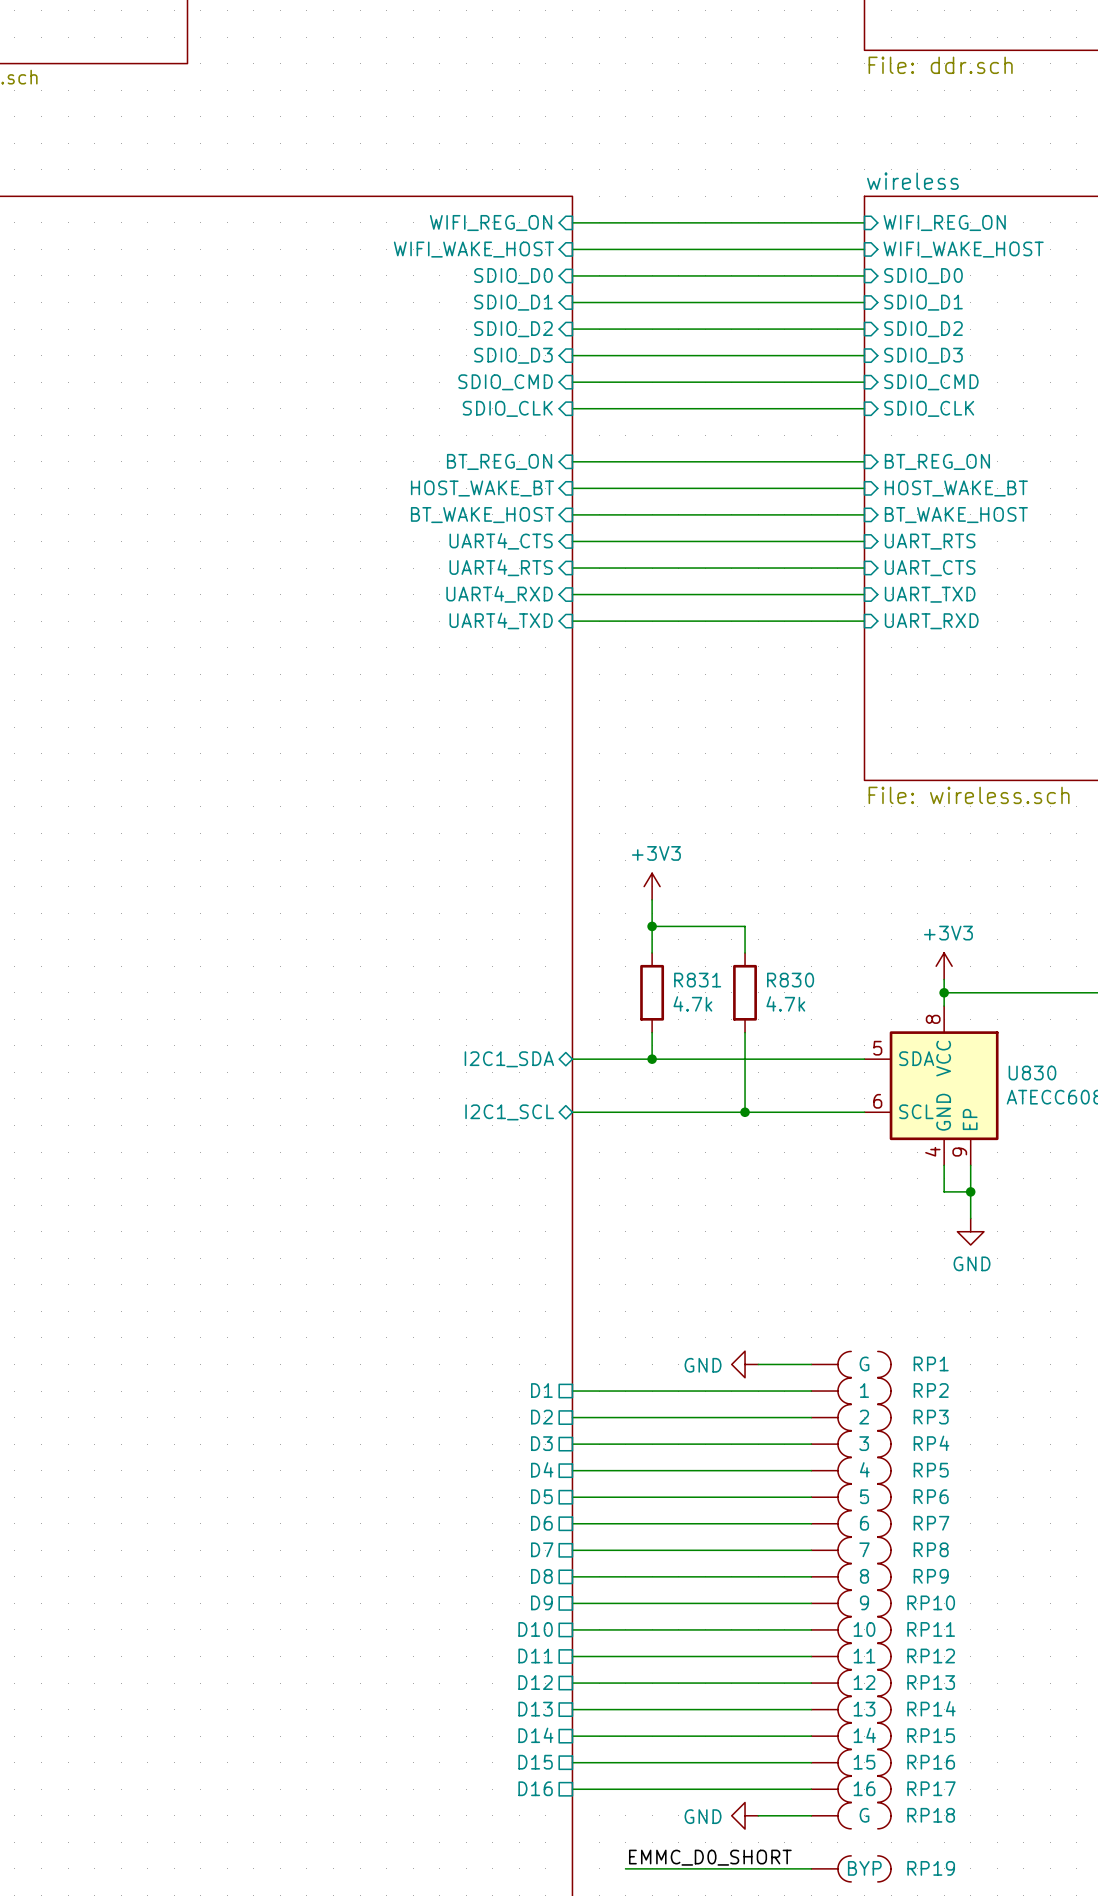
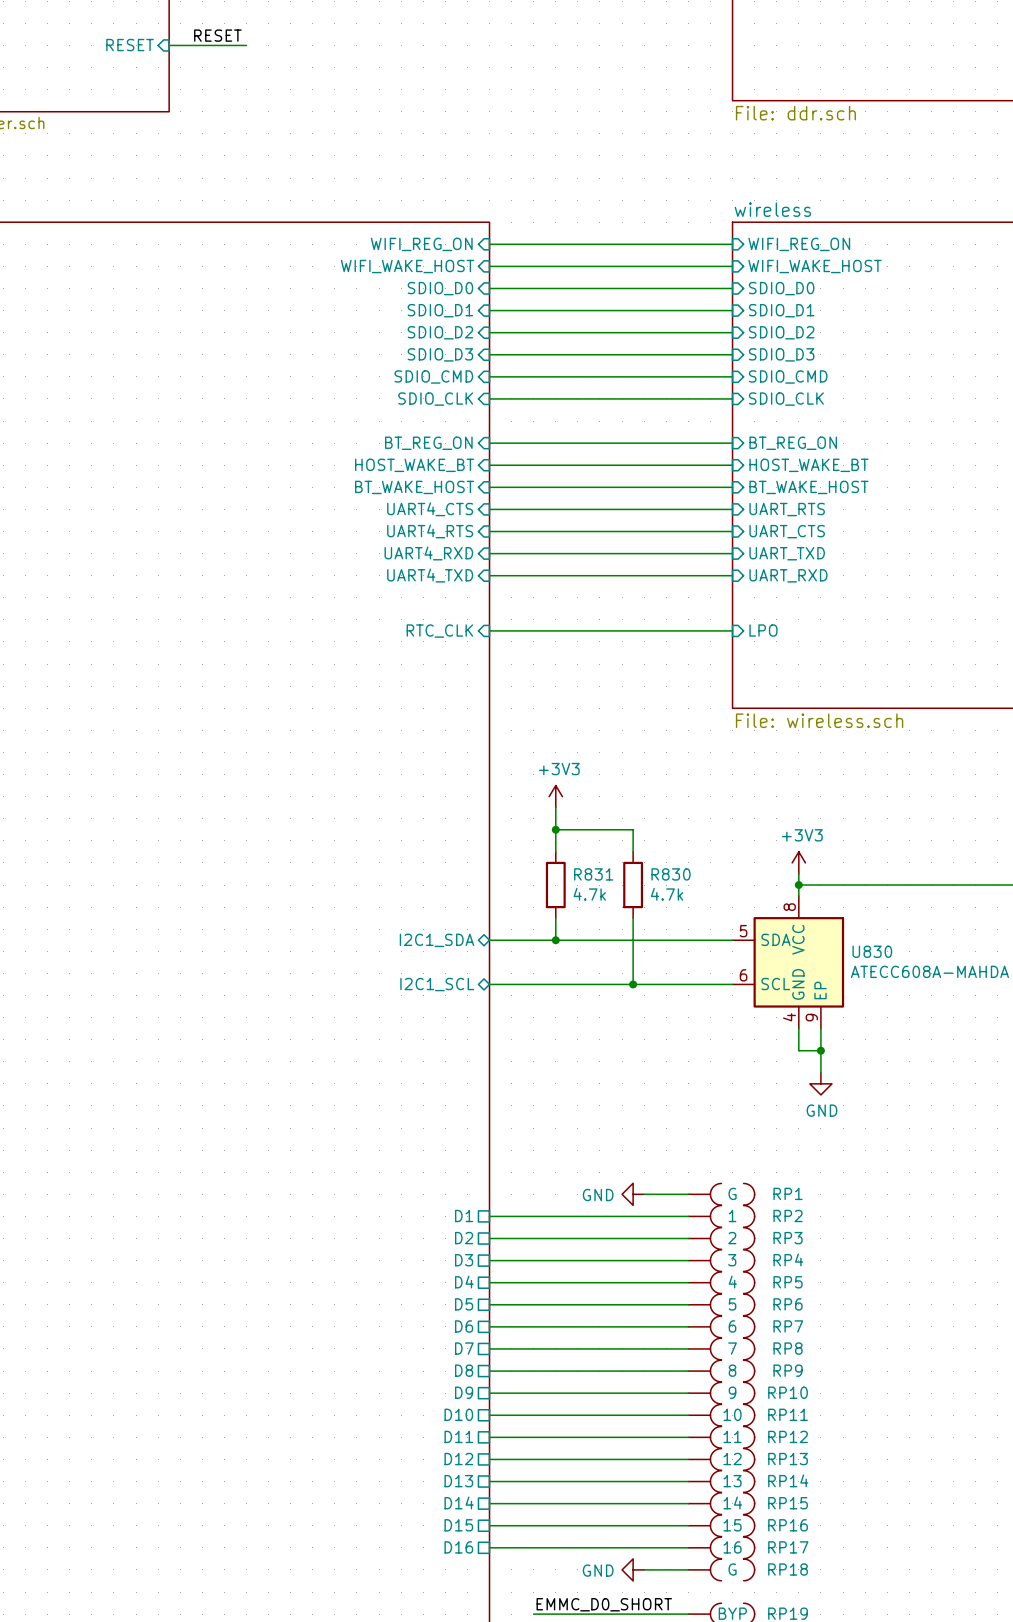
sheet pin: none -> LPO (763, 630)
sheet pin: none -> RTC_CLK (439, 631)
wire: none -> (489, 630) (732, 630)

